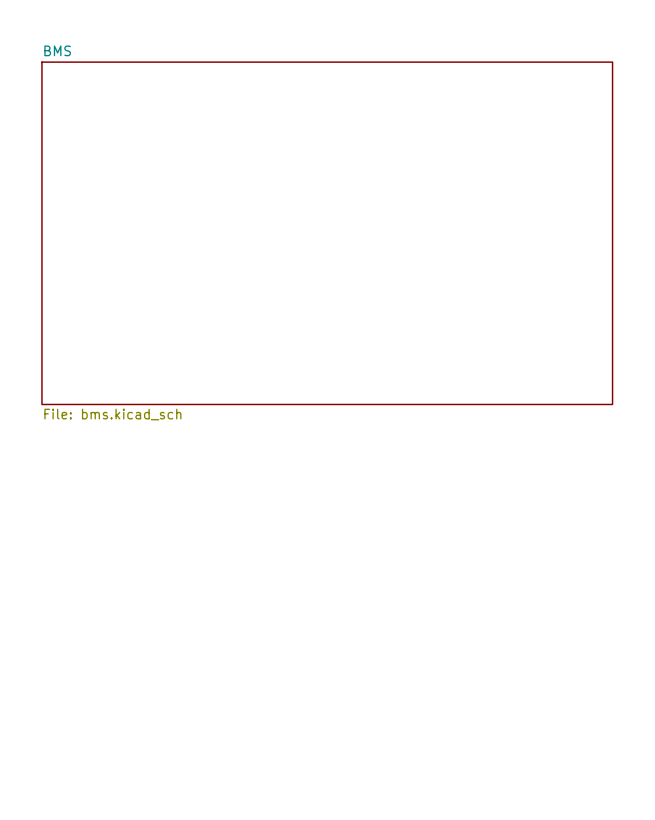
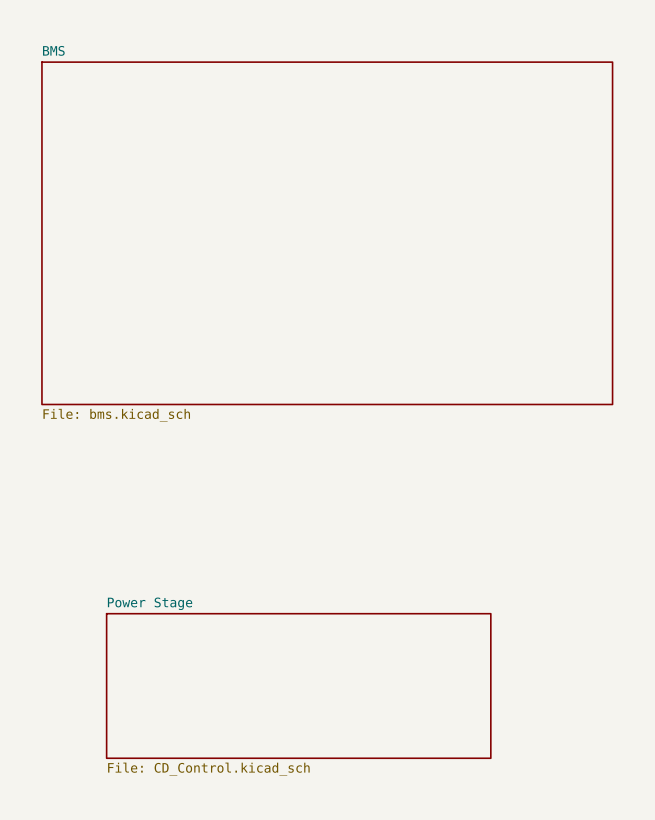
sheet Power Stage: none -> File: CD_Control.kicad_sch (298, 685)

